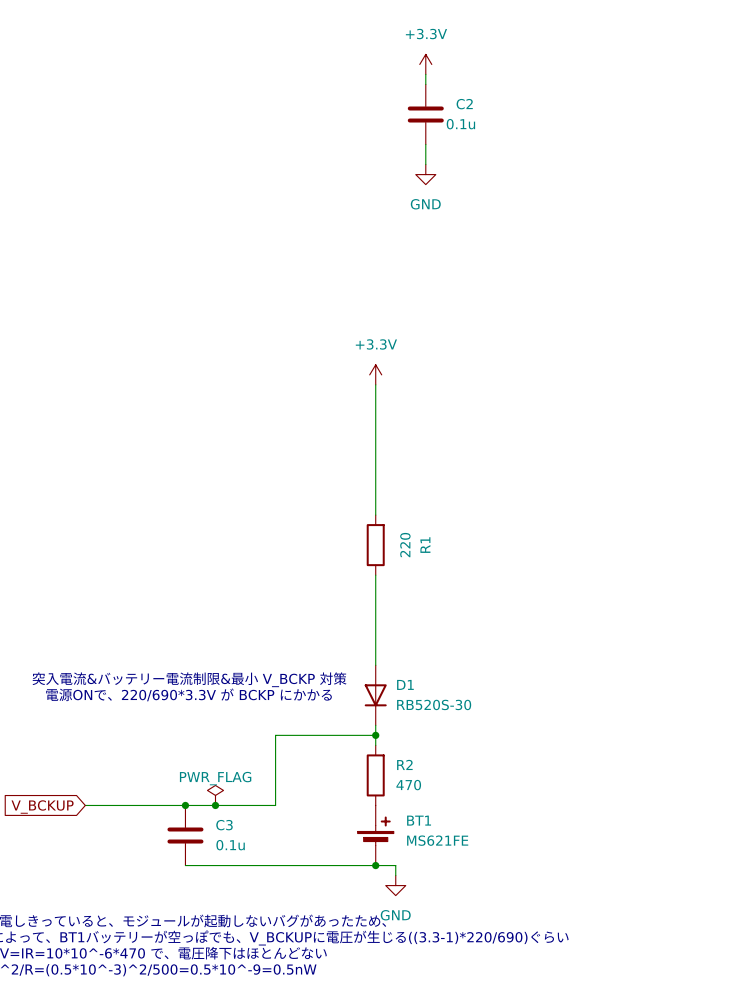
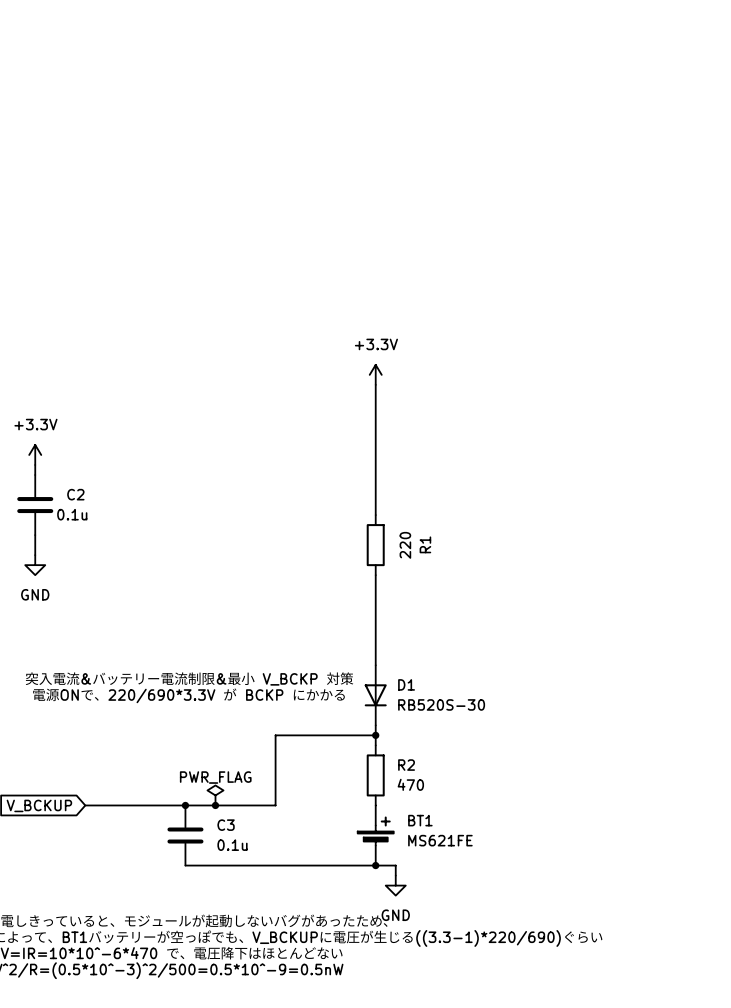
power symbol: +3.3V (425, 64) -> none
wire: (425, 74) (425, 84) -> none
C2 position: (425, 114) -> (35, 505)
wire: (425, 144) (425, 164) -> none
power symbol: GND (425, 174) -> none
power symbol: none -> +3.3V (35, 454)
wire: none -> (35, 464) (35, 475)
wire: none -> (35, 535) (35, 555)
power symbol: none -> GND (35, 565)

